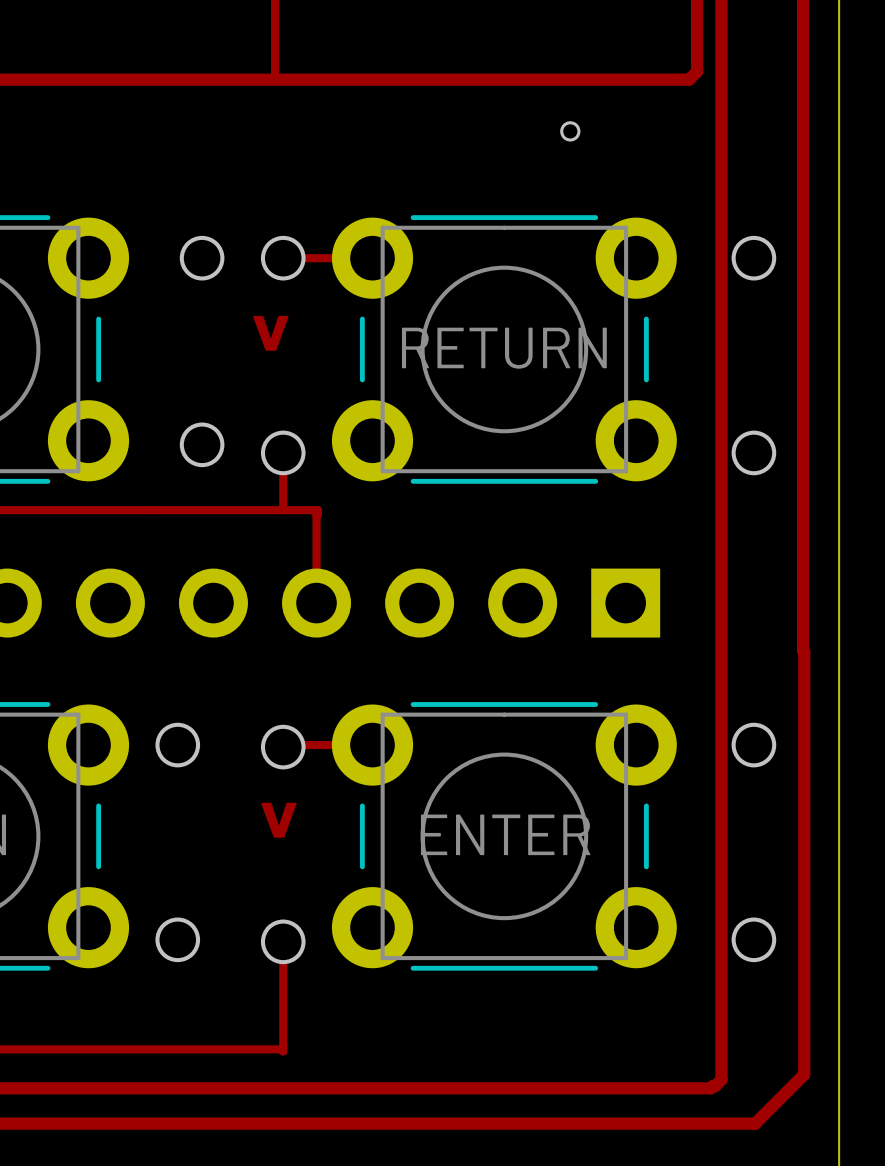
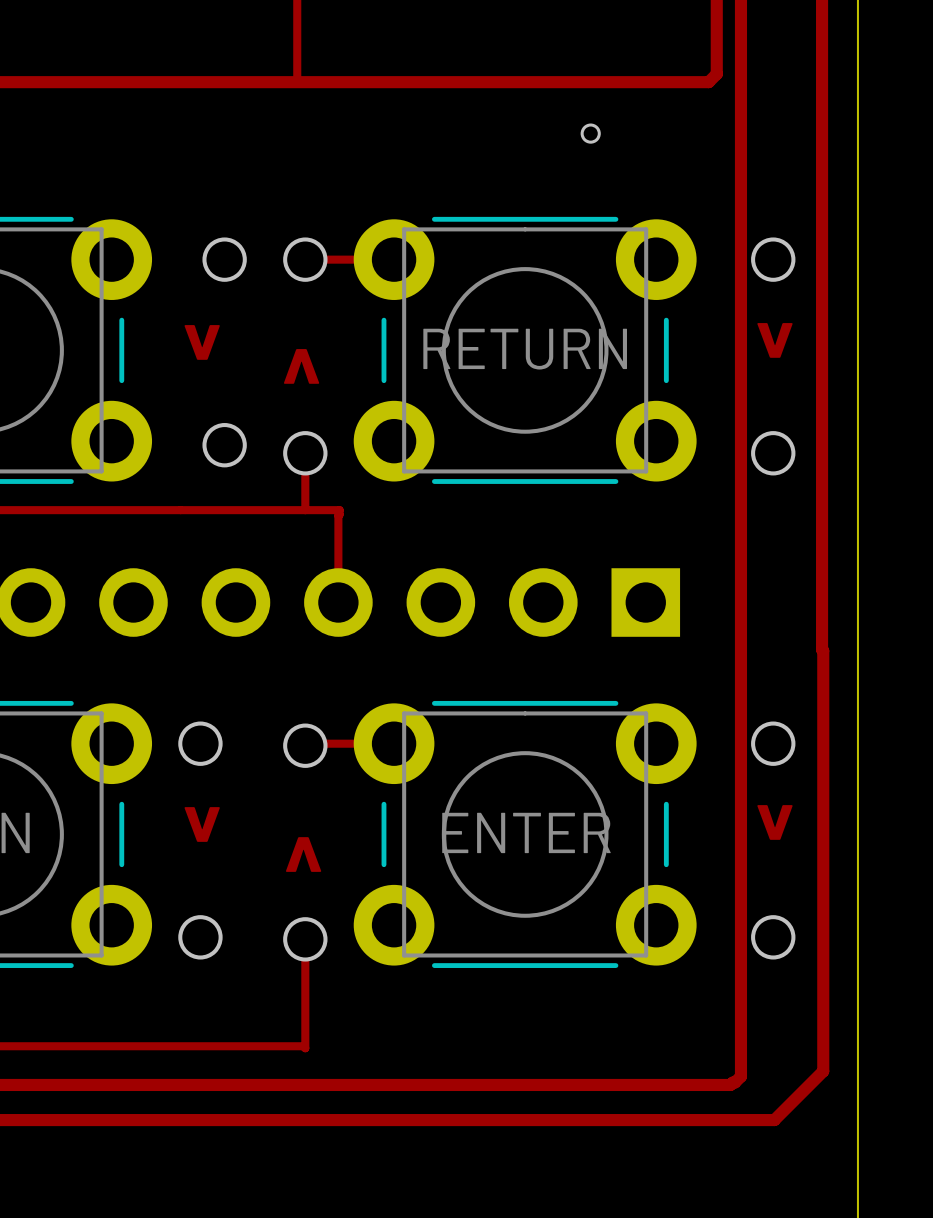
text: ^ (270, 333) -> none
text: none -> ^ (775, 340)
text: none -> ^ (202, 342)
text: none -> ^ (301, 366)
text rotation: 0° (278, 820) -> 180° (303, 854)
text: none -> ^ (775, 822)
text: none -> ^ (202, 824)

